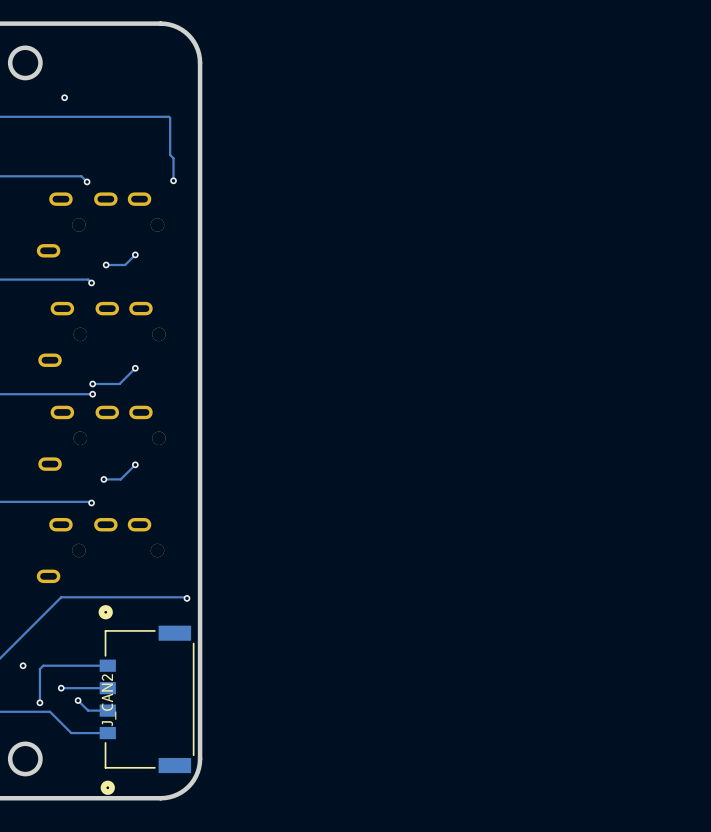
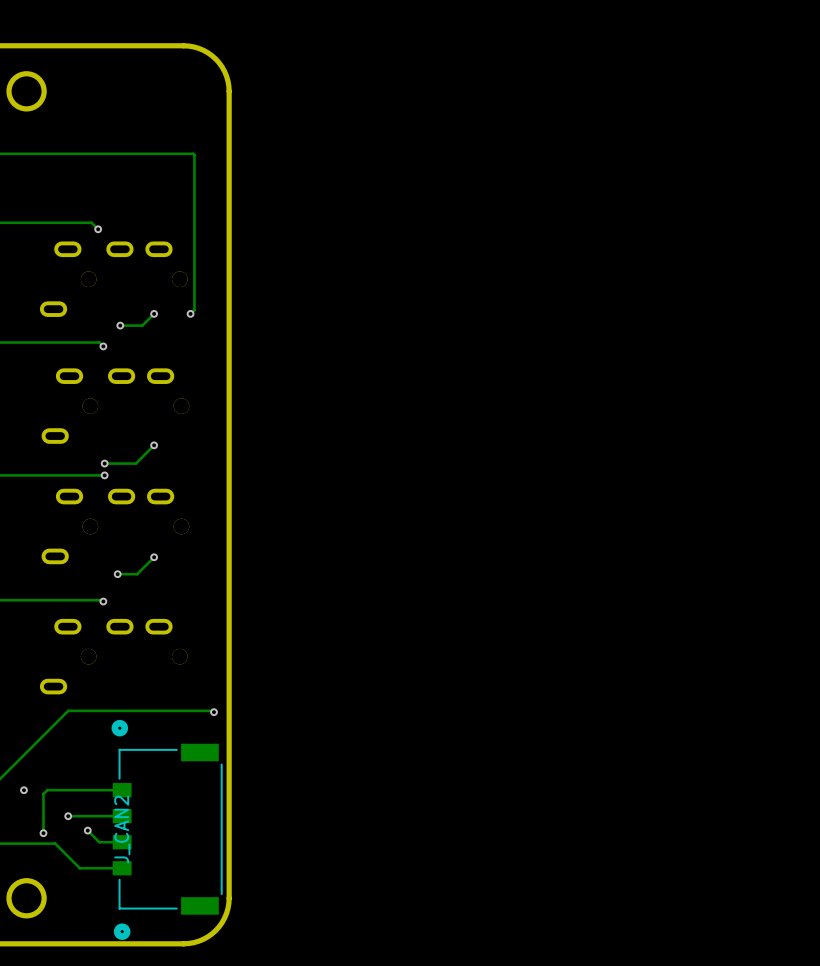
via: (64, 97) -> none
track: (170, 154) (173, 158) (173, 180) -> (194, 198) (194, 309) (190, 313)
via: (173, 180) -> none
via: none -> (190, 313)

